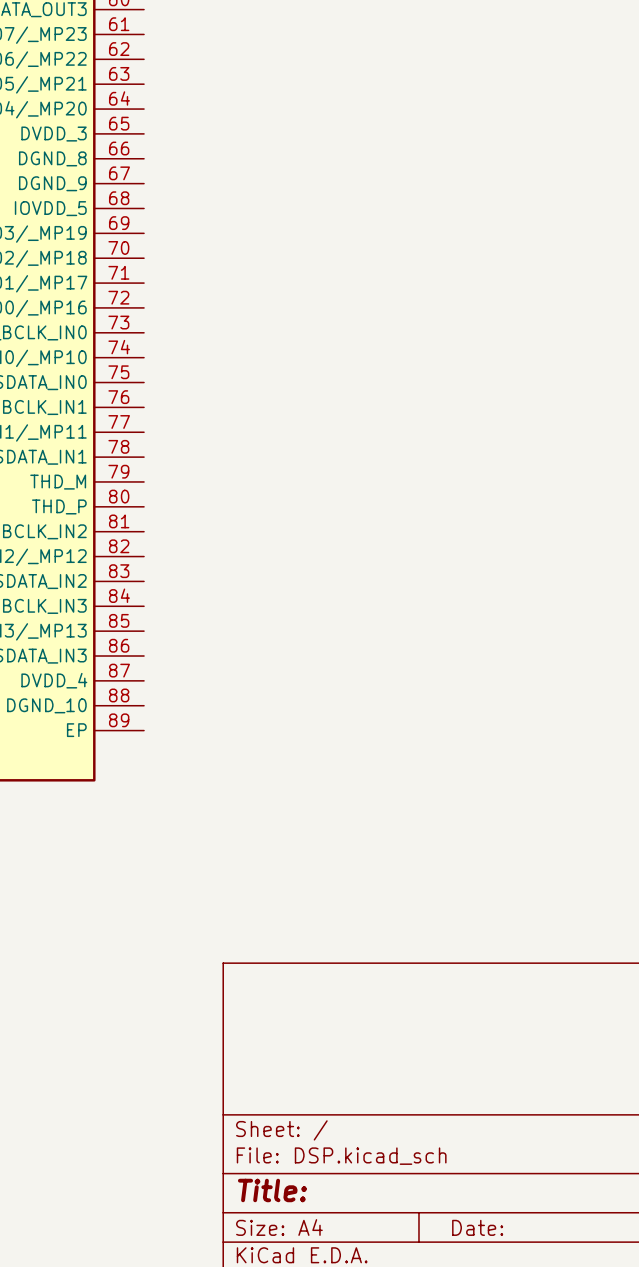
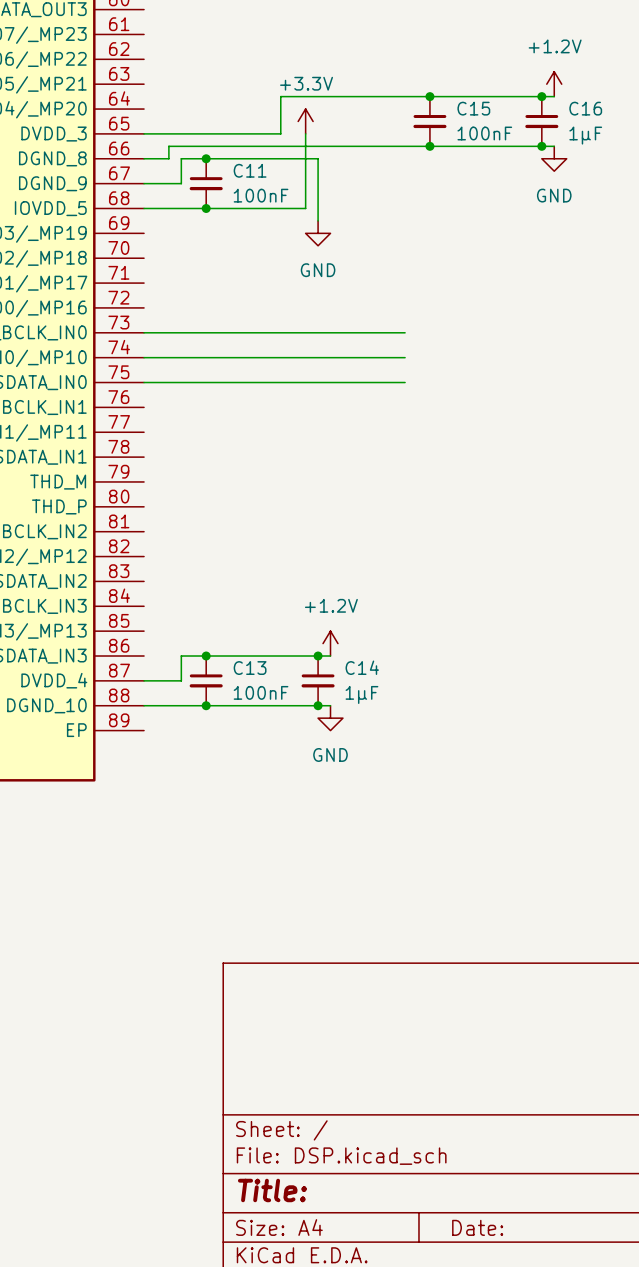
power symbol: none -> +1.2V (554, 84)
junction: none -> (429, 96)
junction: none -> (541, 96)
wire: none -> (554, 96) (280, 96) (280, 133) (144, 133)
power symbol: none -> +3.3V (305, 121)
C15: none -> 100nF (429, 121)
C16: none -> 1μF (541, 121)
wire: none -> (305, 133) (305, 208) (144, 208)
junction: none -> (429, 146)
junction: none -> (541, 146)
wire: none -> (554, 146) (168, 146) (168, 158) (144, 158)
junction: none -> (206, 158)
power symbol: none -> GND (554, 158)
wire: none -> (144, 183) (181, 183) (181, 158) (318, 158) (318, 220)
C11: none -> 100nF (206, 183)
junction: none -> (206, 208)
power symbol: none -> GND (318, 233)
wire: none -> (144, 332) (405, 332)
wire: none -> (144, 357) (405, 357)
wire: none -> (144, 382) (405, 382)
power symbol: none -> +1.2V (330, 643)
junction: none -> (206, 656)
junction: none -> (318, 656)
wire: none -> (330, 656) (181, 656) (181, 680) (144, 680)
C13: none -> 100nF (206, 680)
C14: none -> 1μF (318, 680)
wire: none -> (144, 705) (330, 705)
junction: none -> (206, 705)
junction: none -> (318, 705)
power symbol: none -> GND (330, 718)

